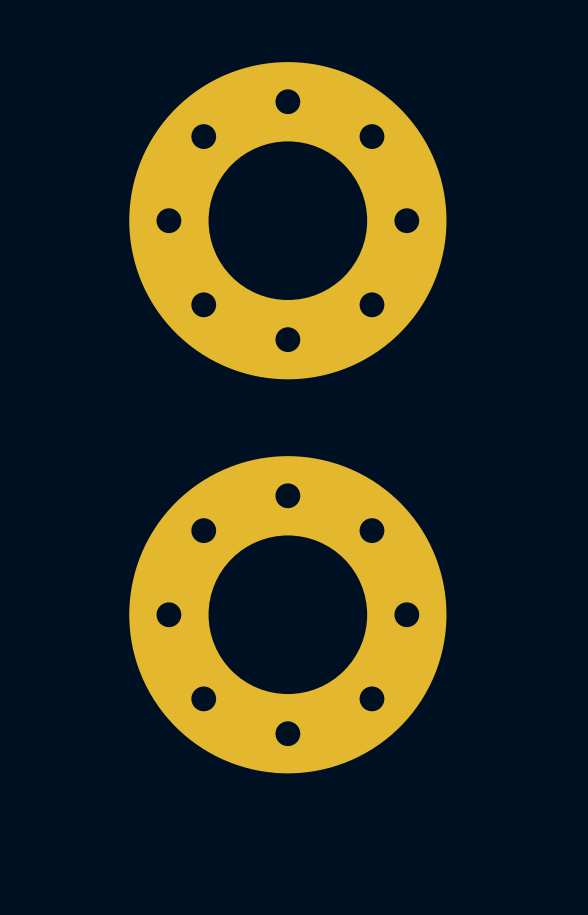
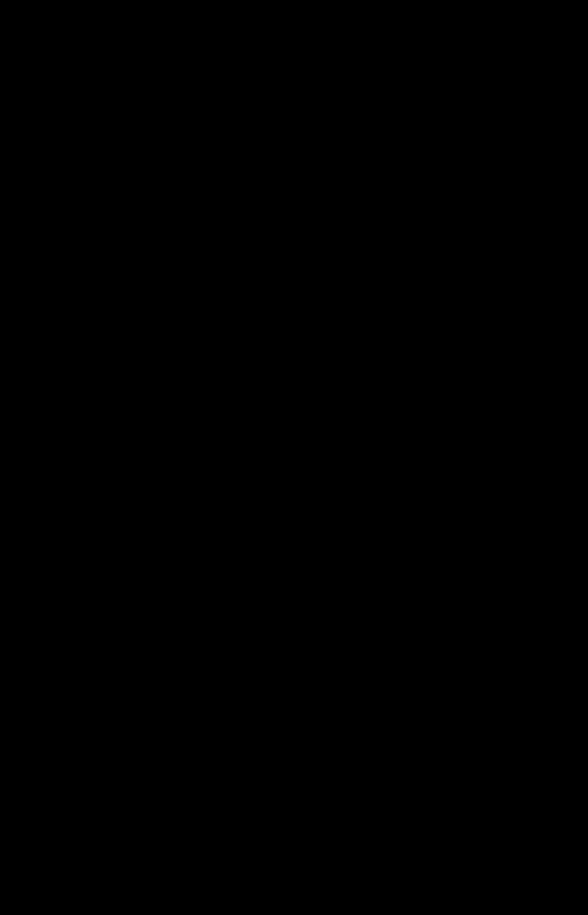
part: (287, 220) -> none
part: (287, 614) -> none

